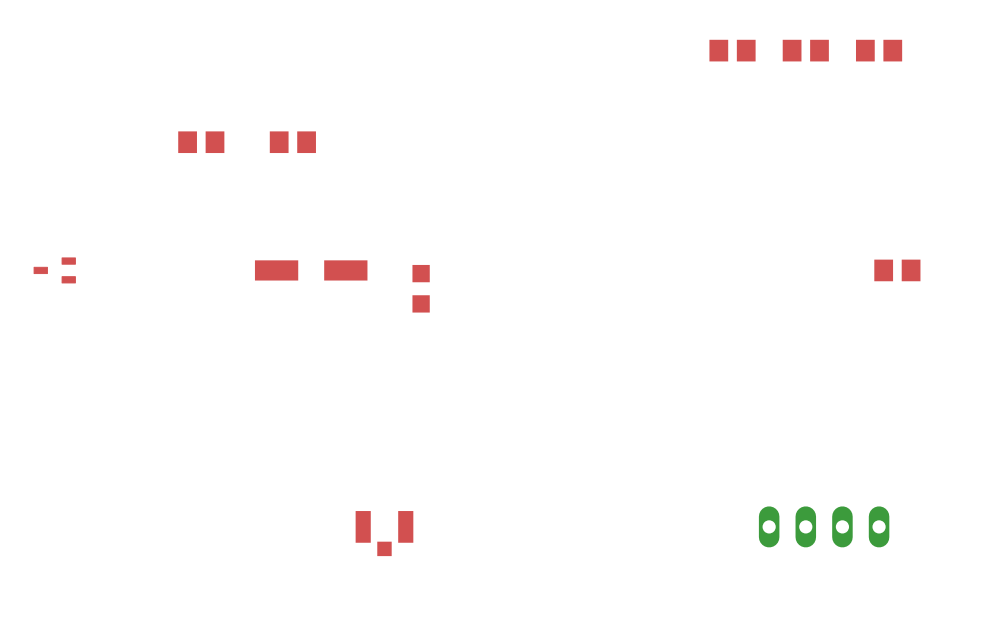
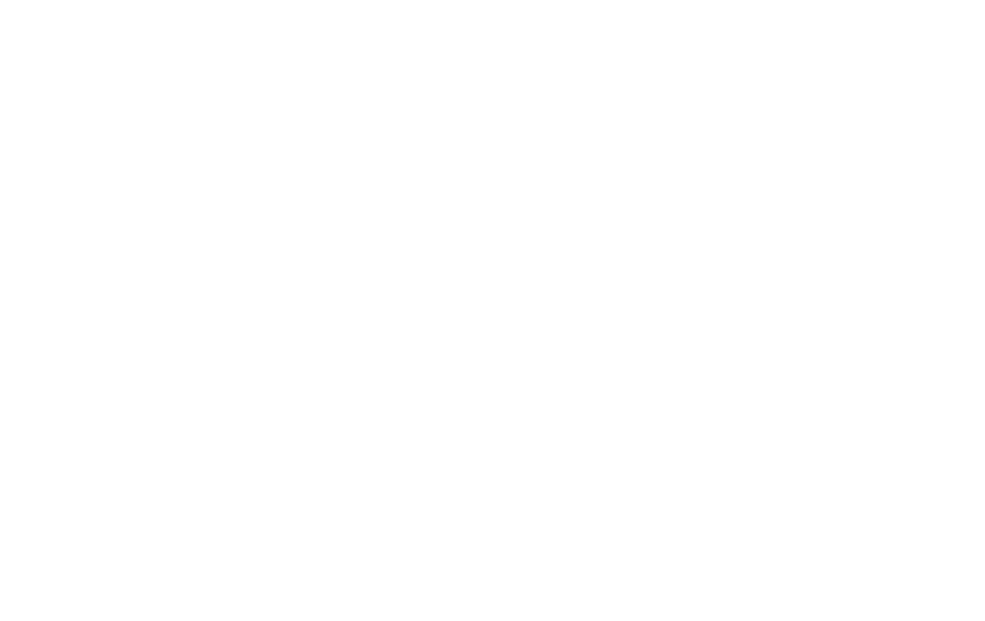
part: (732, 50) -> none
part: (805, 50) -> none
part: (879, 50) -> none
part: (201, 142) -> none
part: (292, 142) -> none
part: (54, 270) -> none
part: (311, 270) -> none
part: (897, 270) -> none
part: (421, 288) -> none
part: (824, 526) -> none
part: (384, 533) -> none

